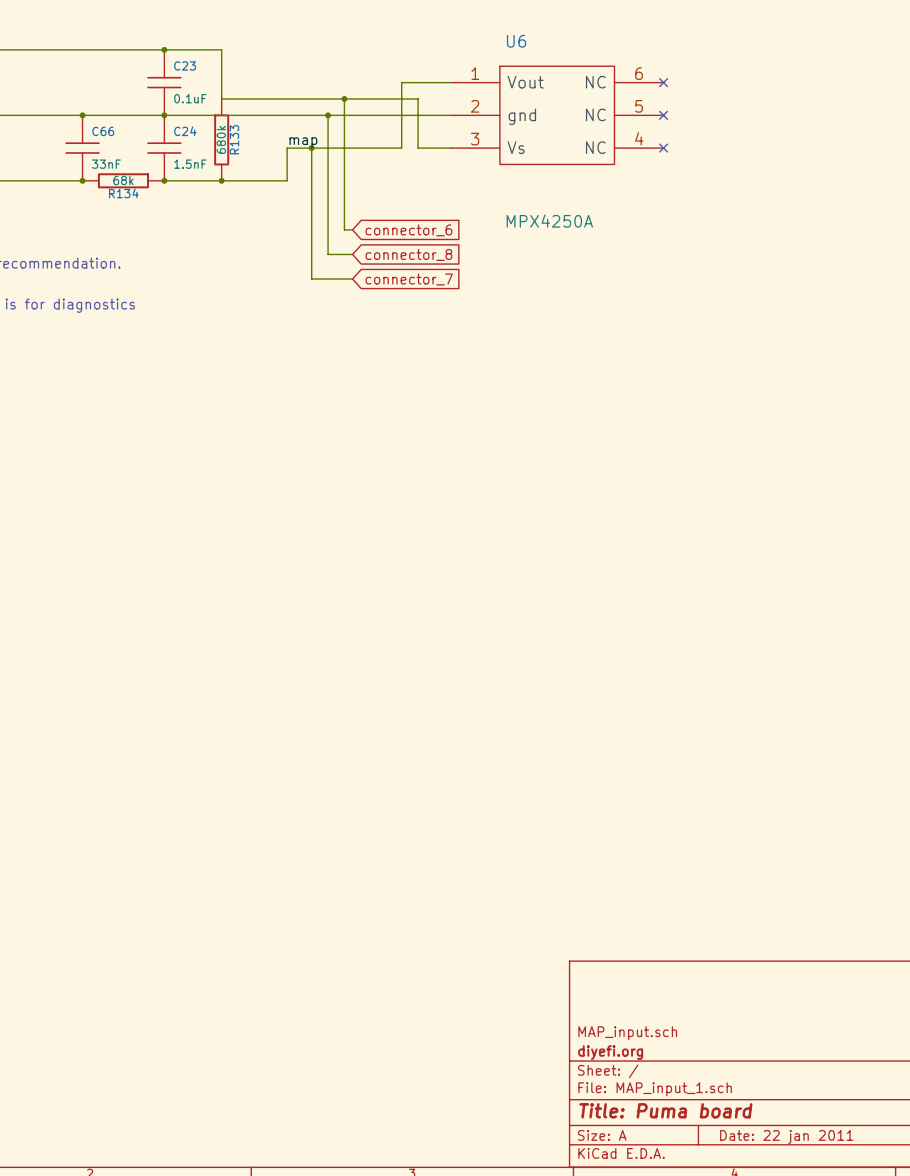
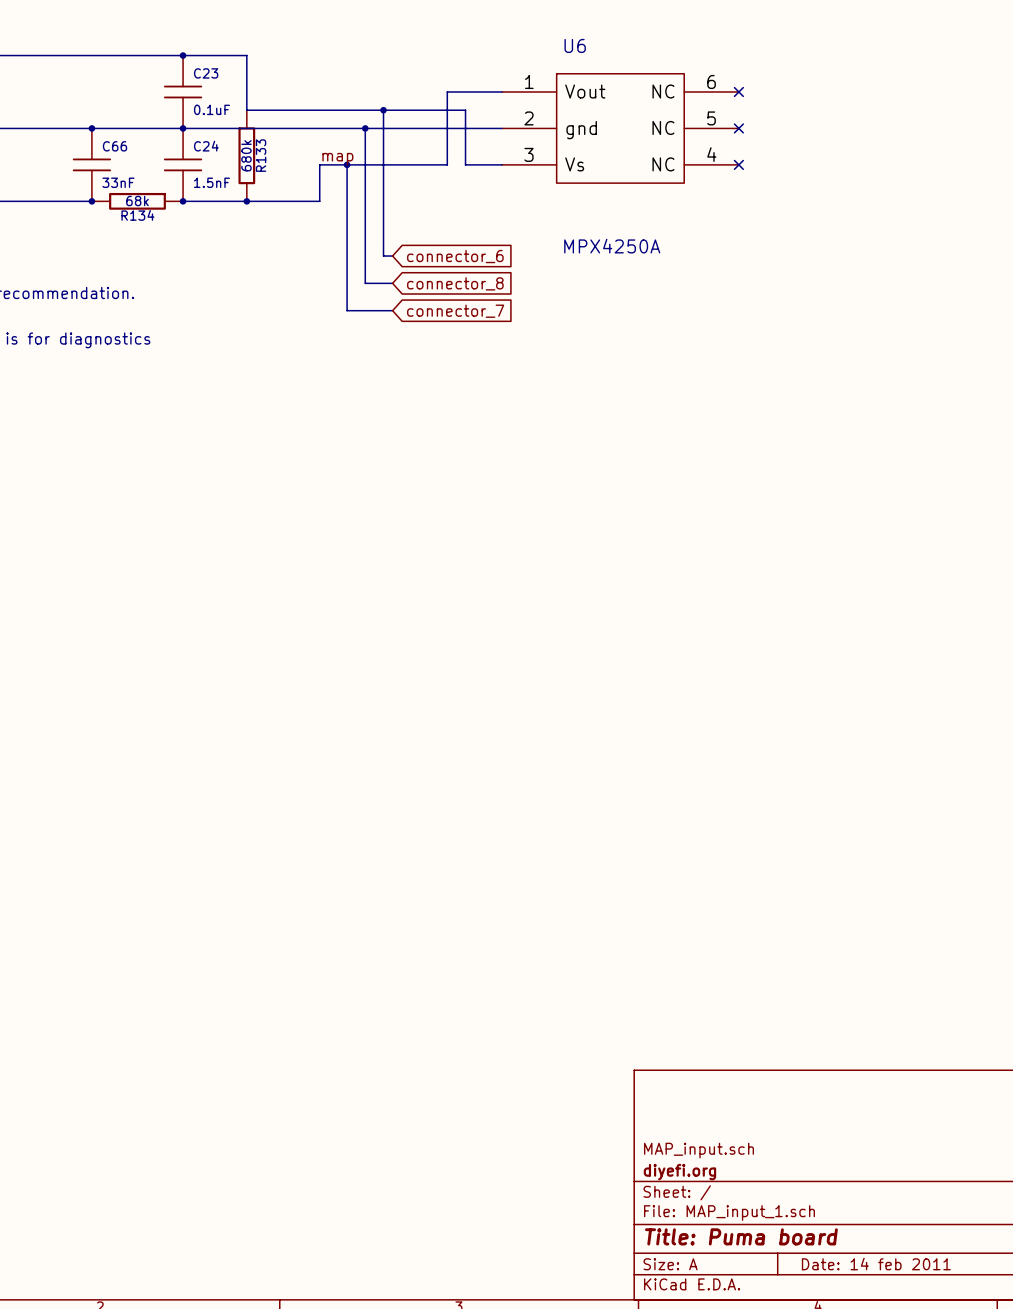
title block: Date: 22 jan 2011 (786, 1137) -> Date: 14 feb 2011 (876, 1264)

